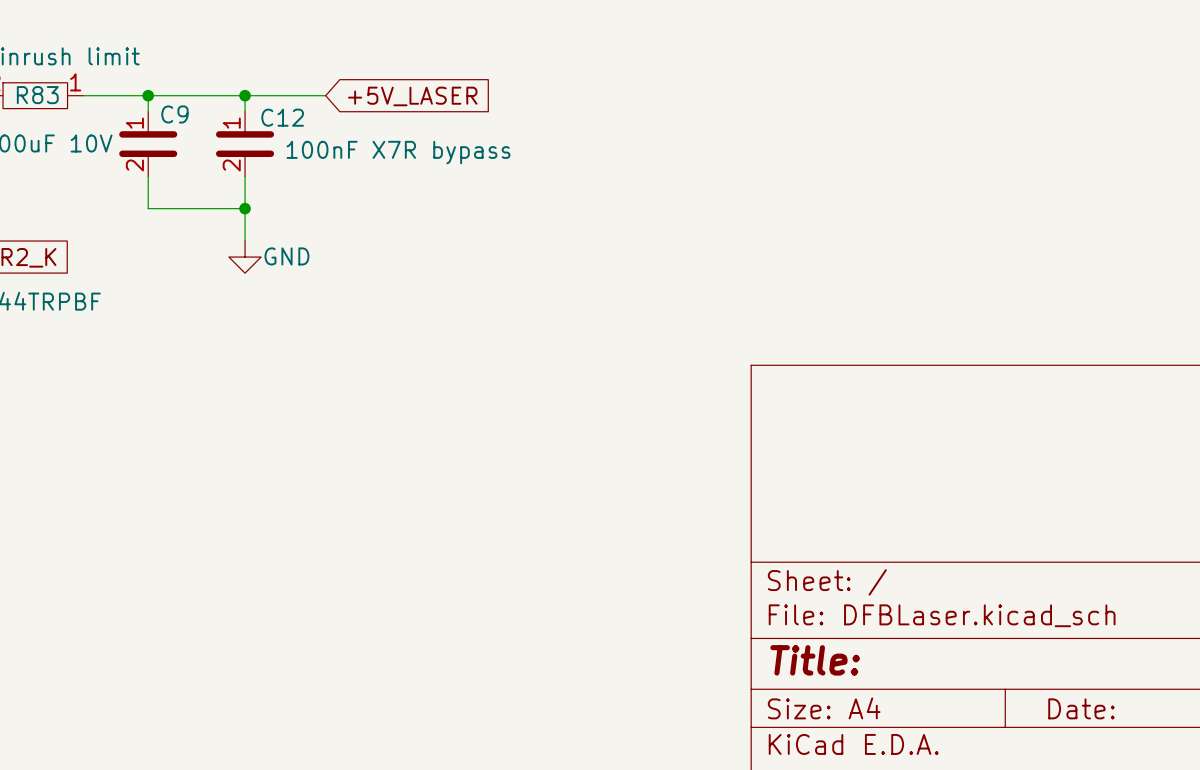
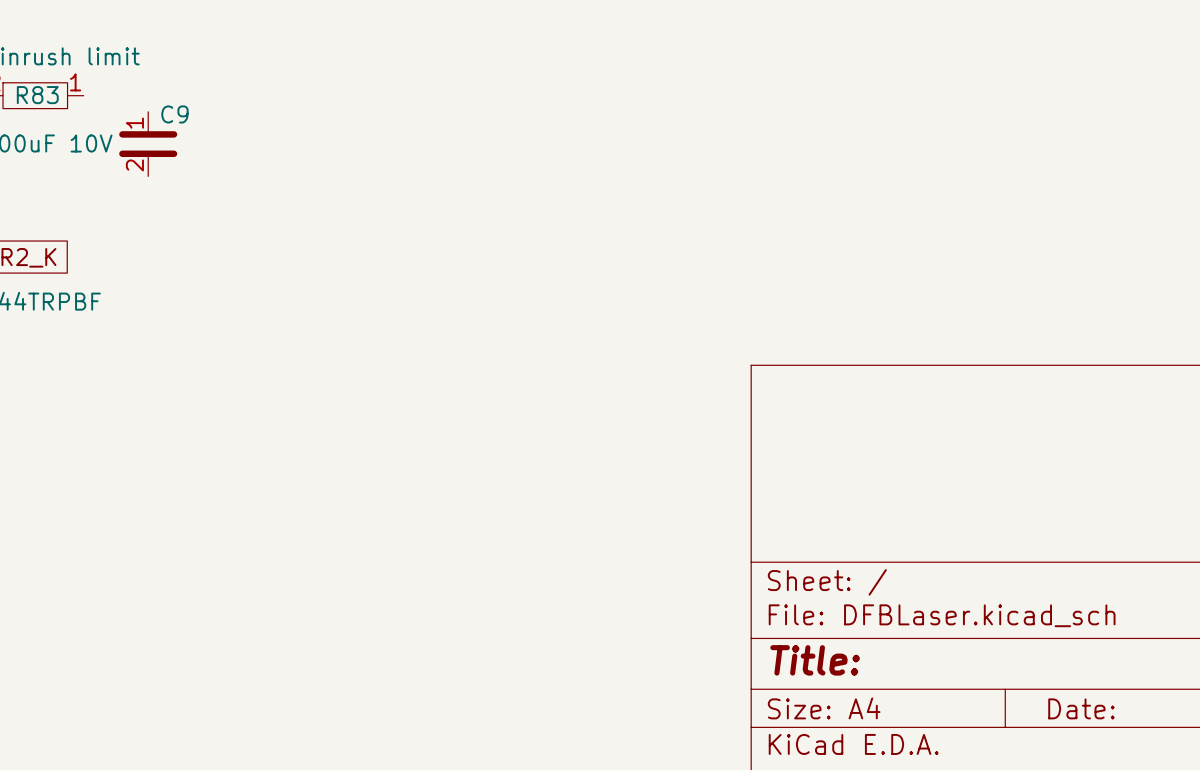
wire: (83, 95) (325, 95) -> none
wire: (148, 95) (148, 111) -> none
junction: (148, 95) -> none
wire: (245, 95) (245, 111) -> none
junction: (245, 95) -> none
global label: +5V_LASER (412, 96) -> none
C12: 100nF X7R bypass (245, 144) -> none
wire: (148, 176) (148, 208) (245, 208) -> none
wire: (245, 176) (245, 240) -> none
junction: (245, 208) -> none
power symbol: GND (245, 257) -> none

